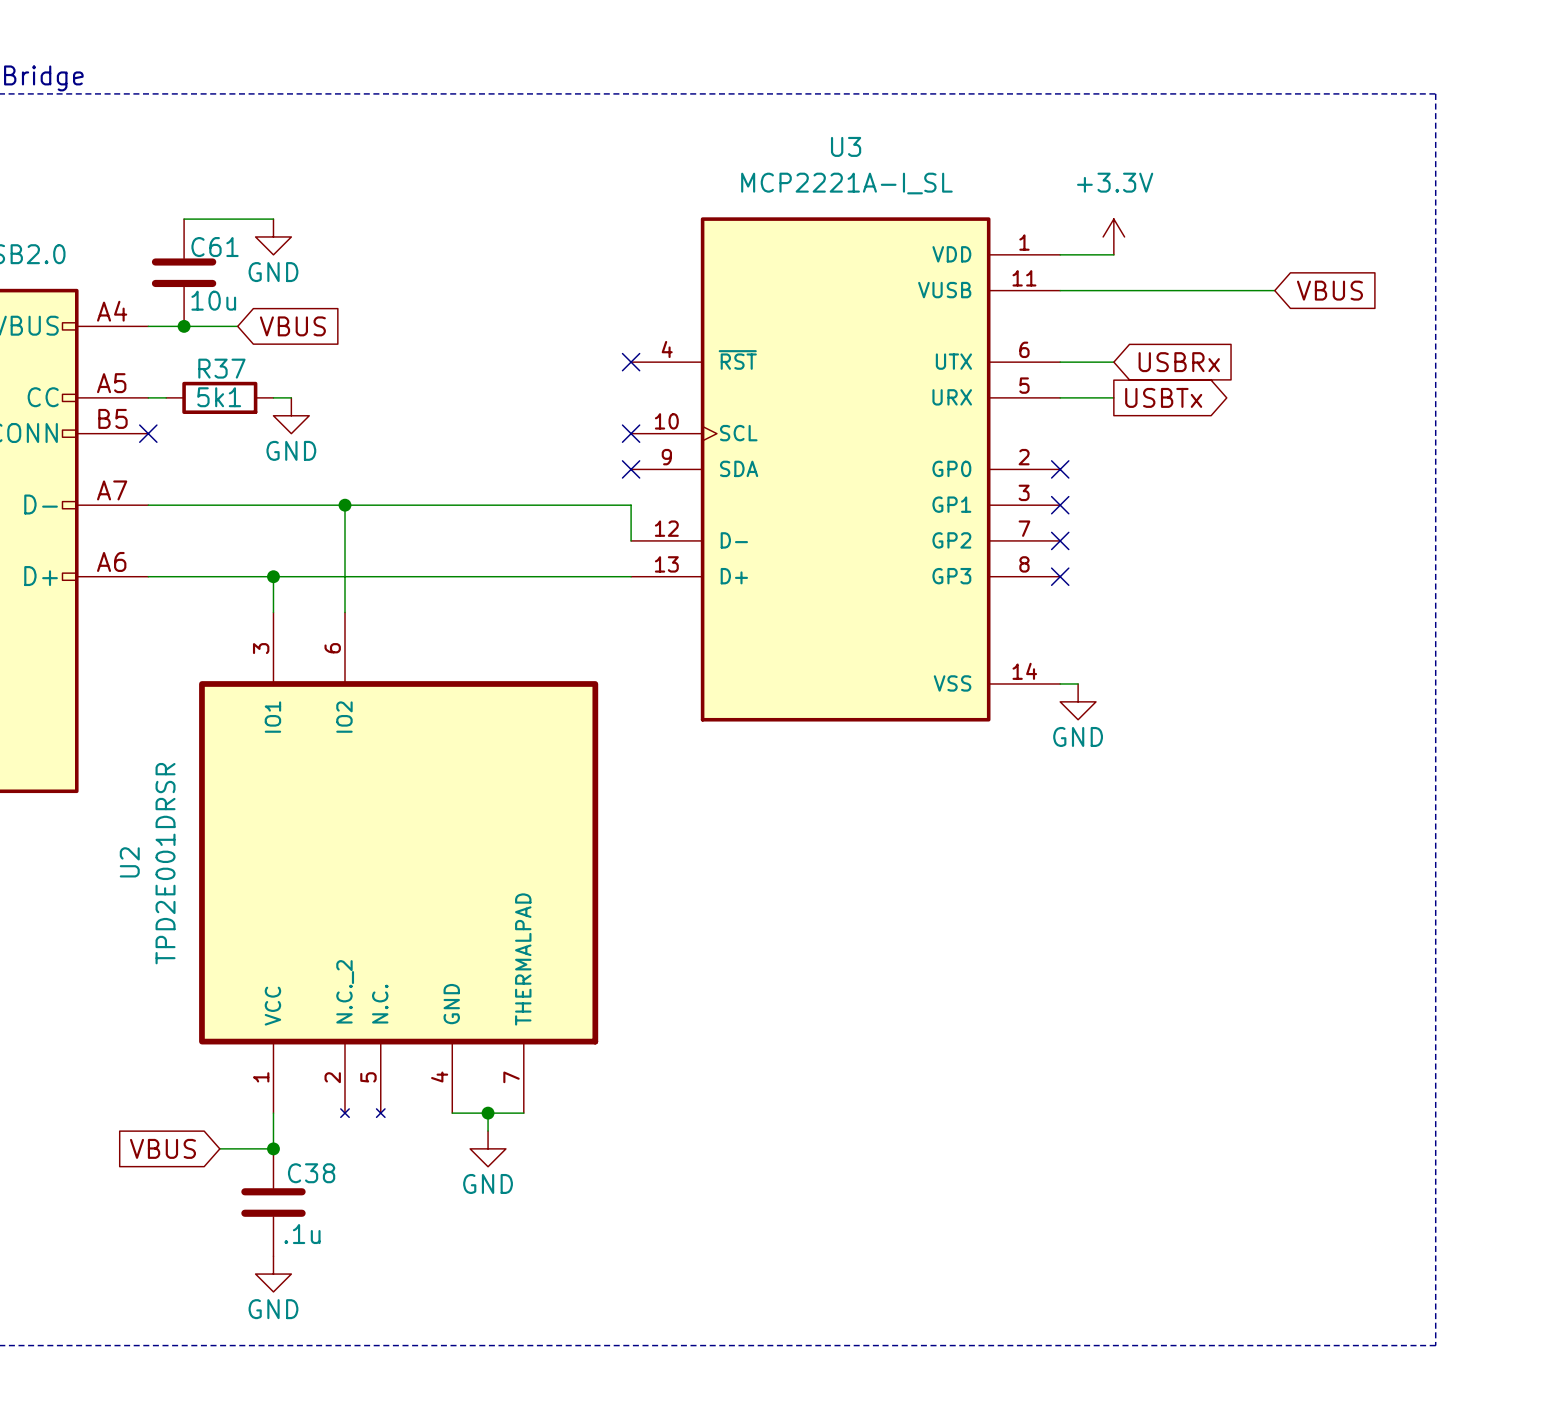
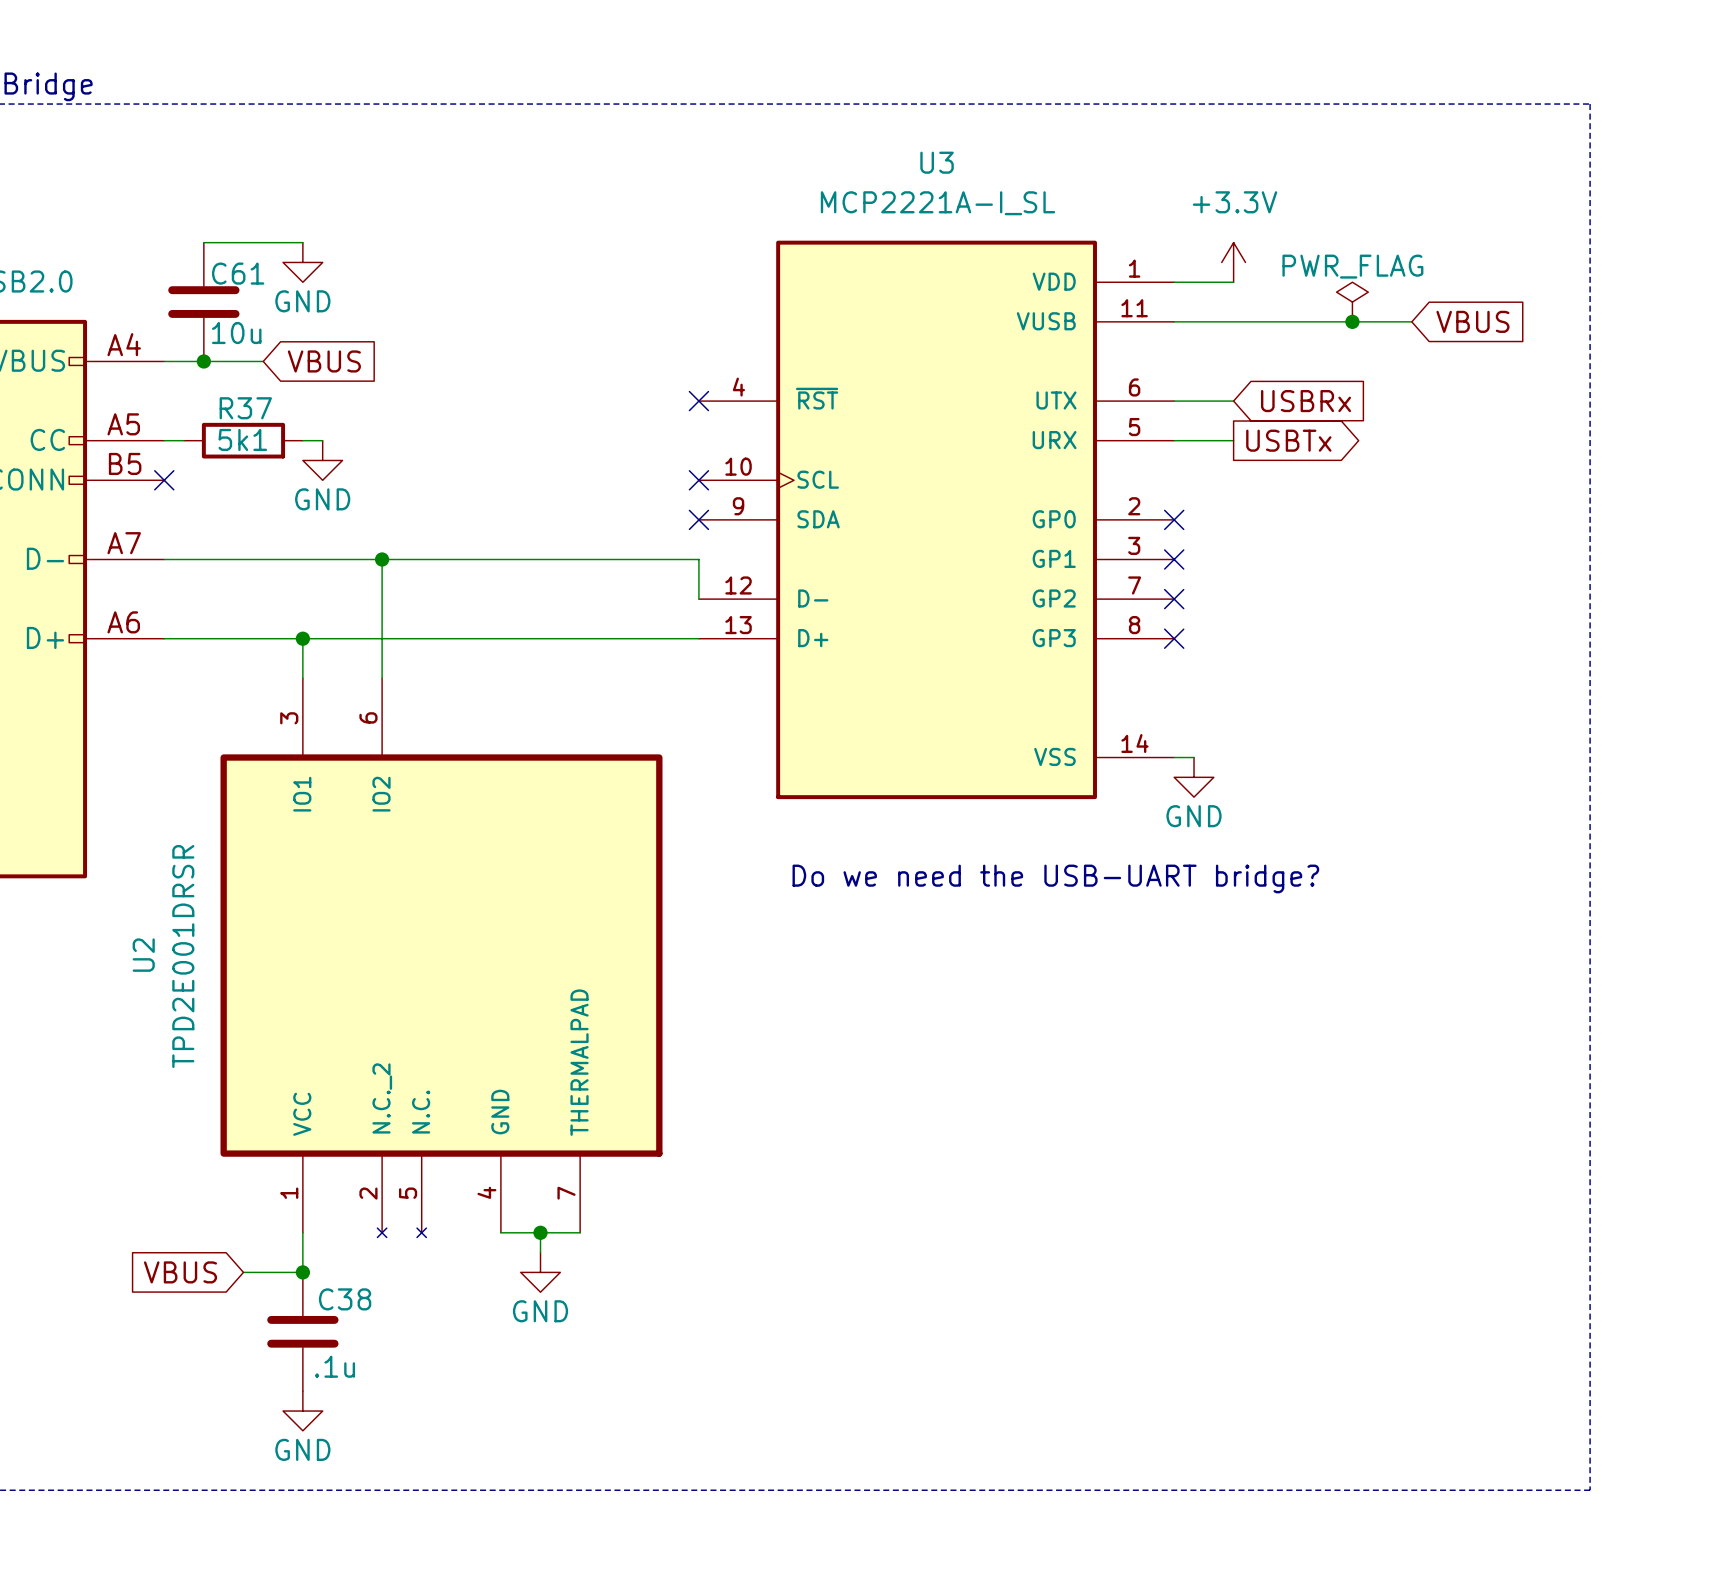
power symbol: none -> PWR_FLAG (1352, 302)
junction: none -> (1352, 321)
text: none -> Do we need the USB-UART bridge? (1055, 878)

